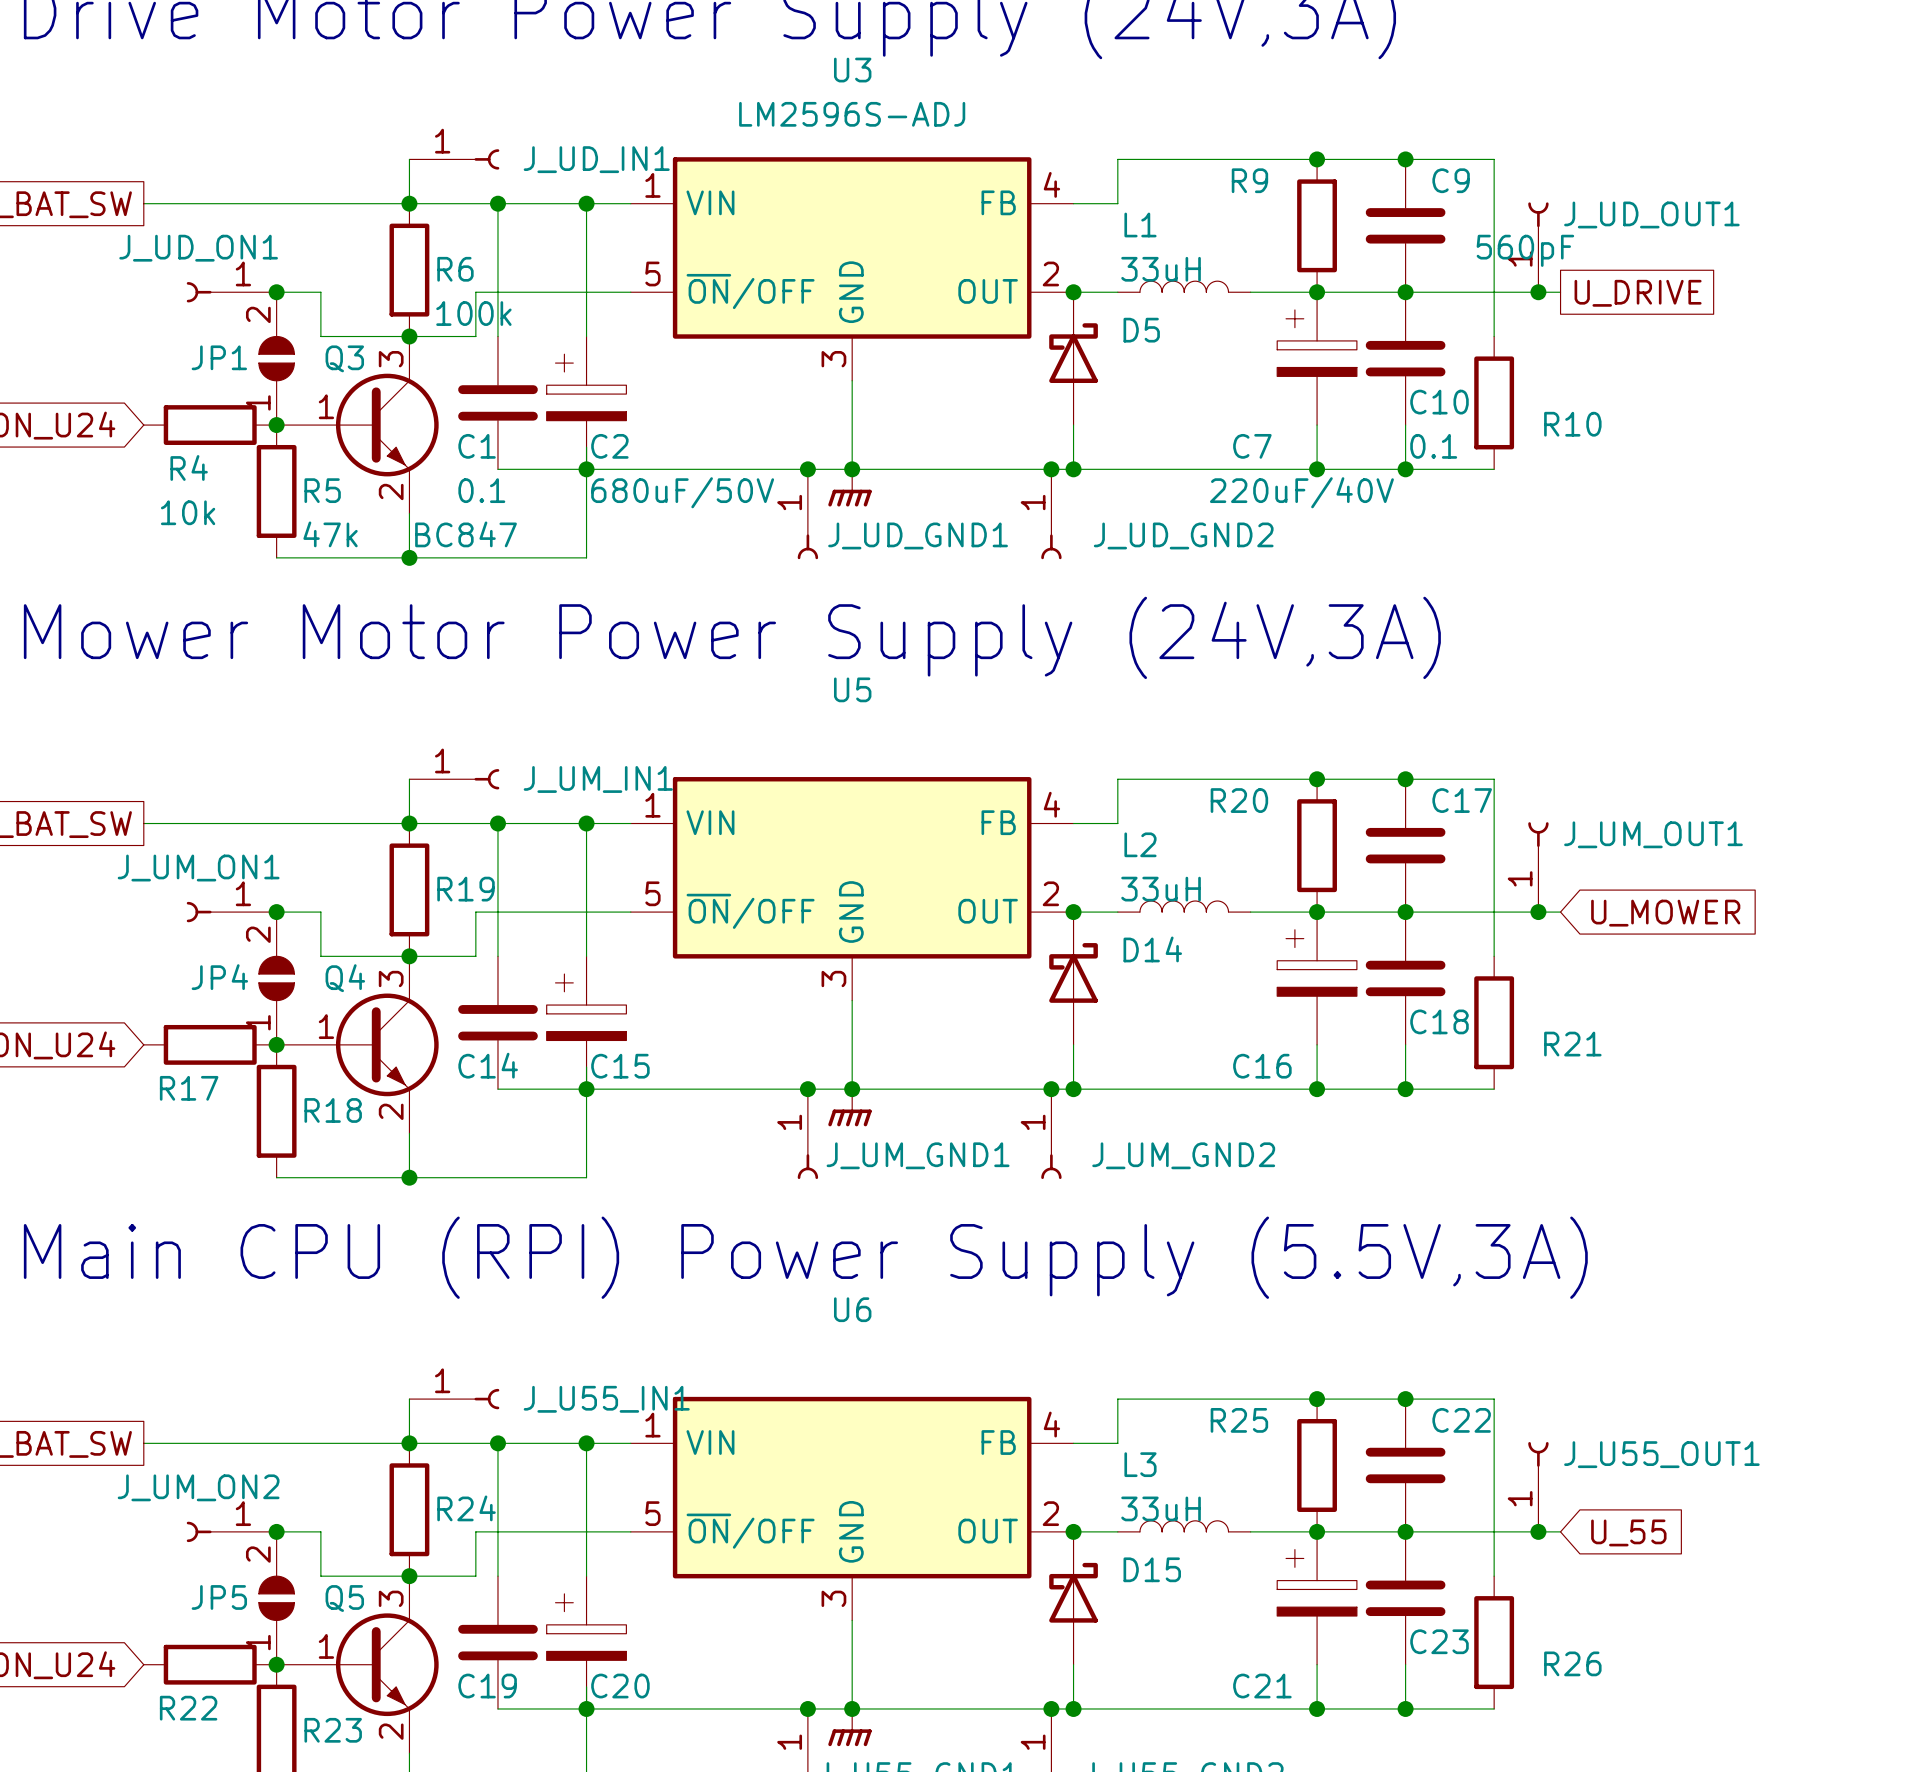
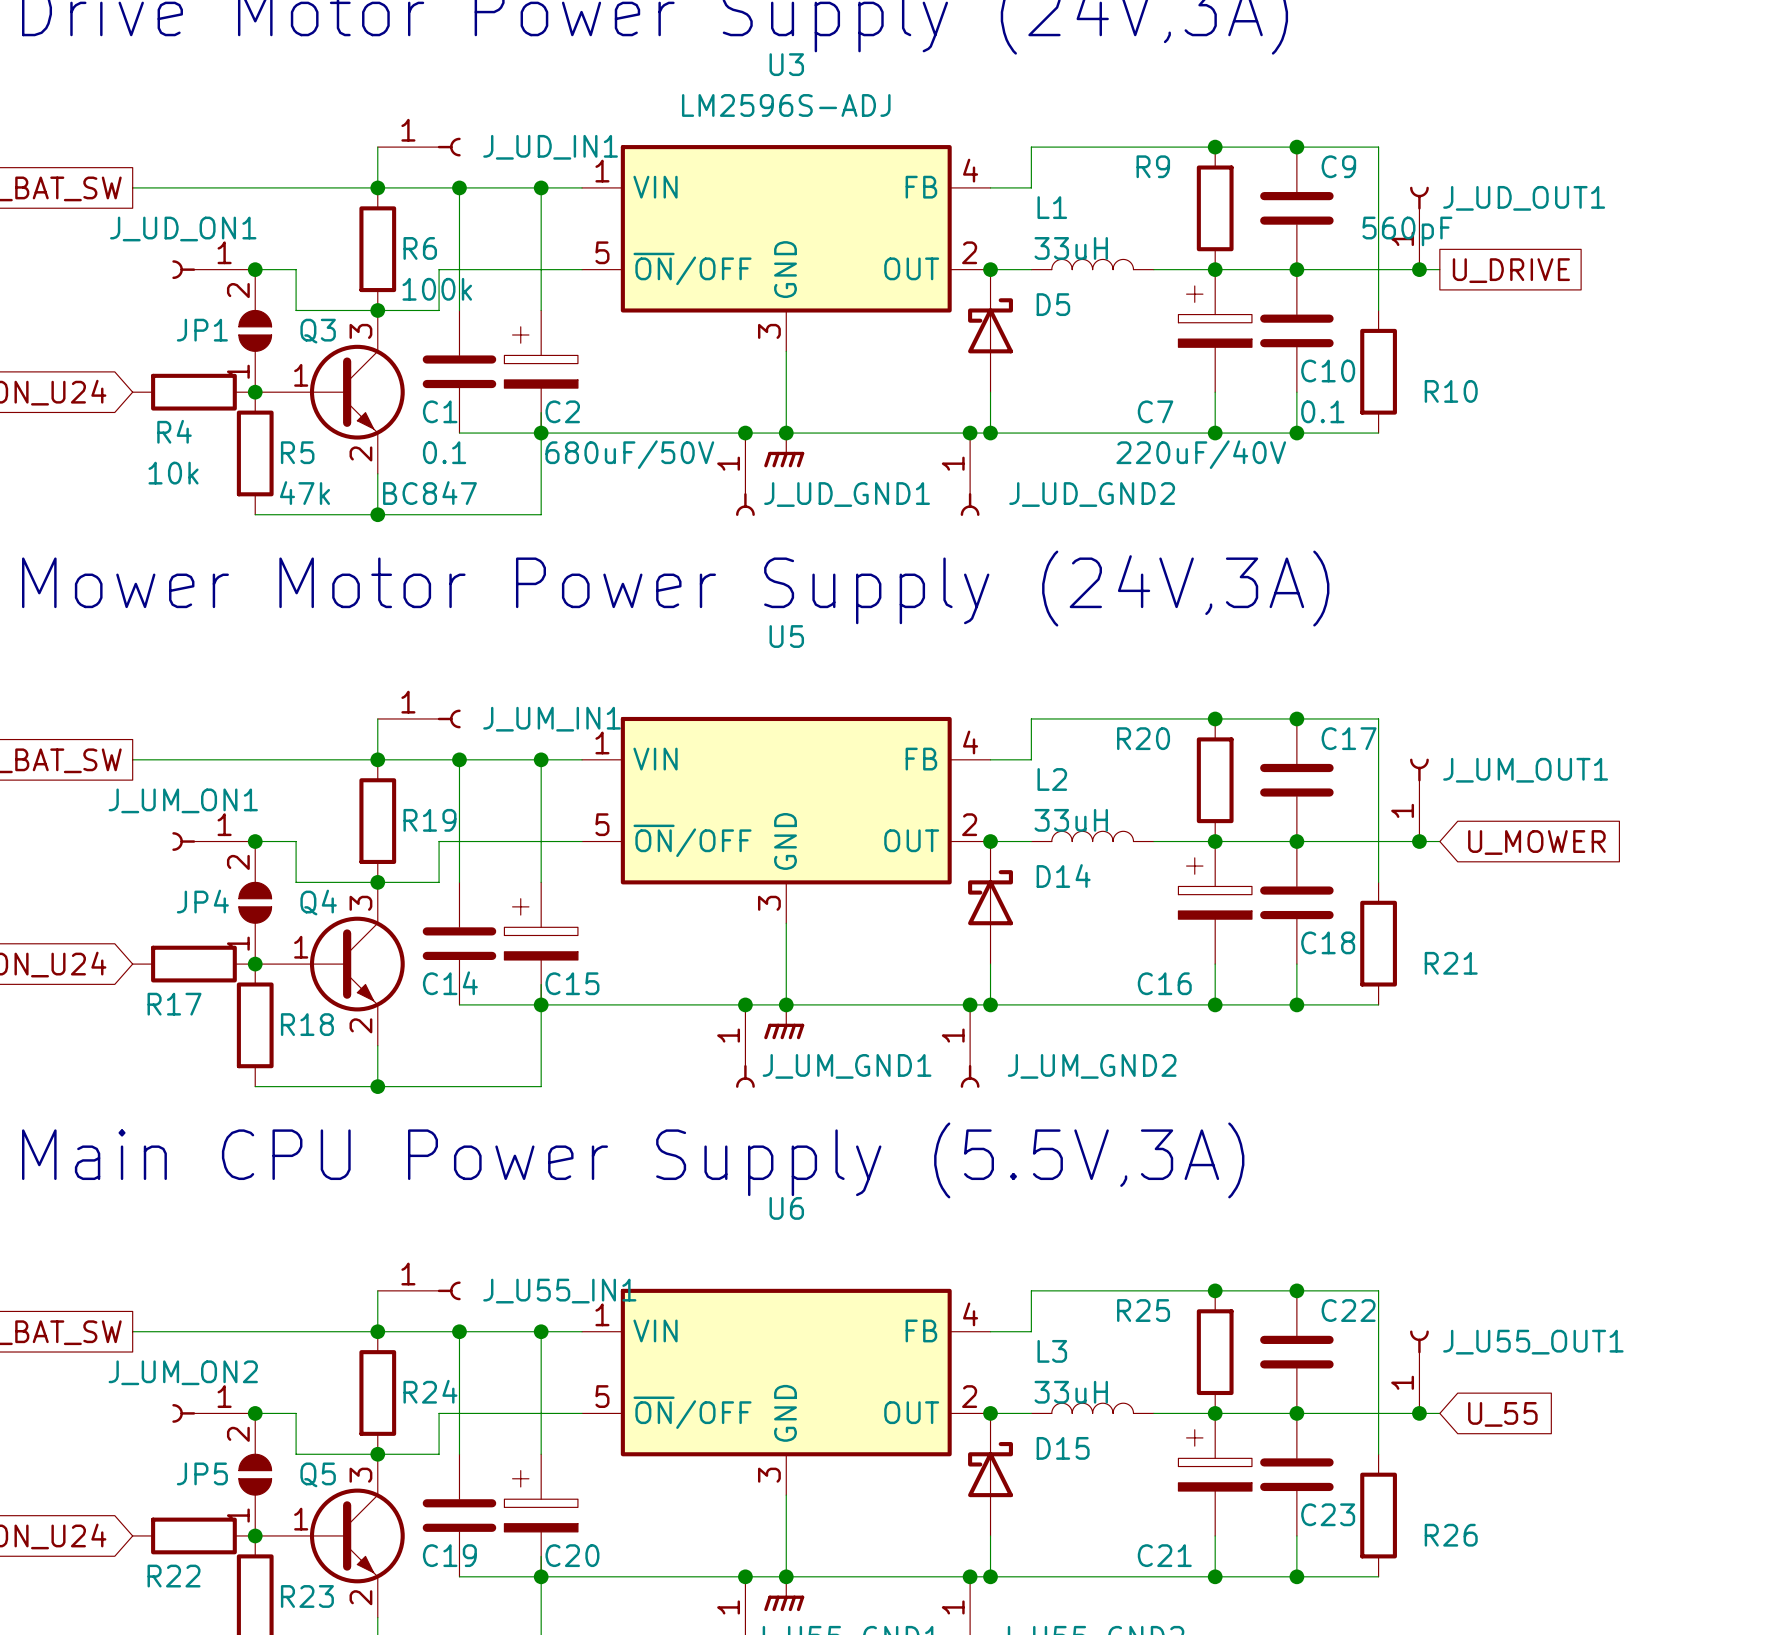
text: Main CPU (RPI) Power Supply (5.5V,3A) (805, 1257) -> Main CPU Power Supply (5.5V,3A) (633, 1160)

